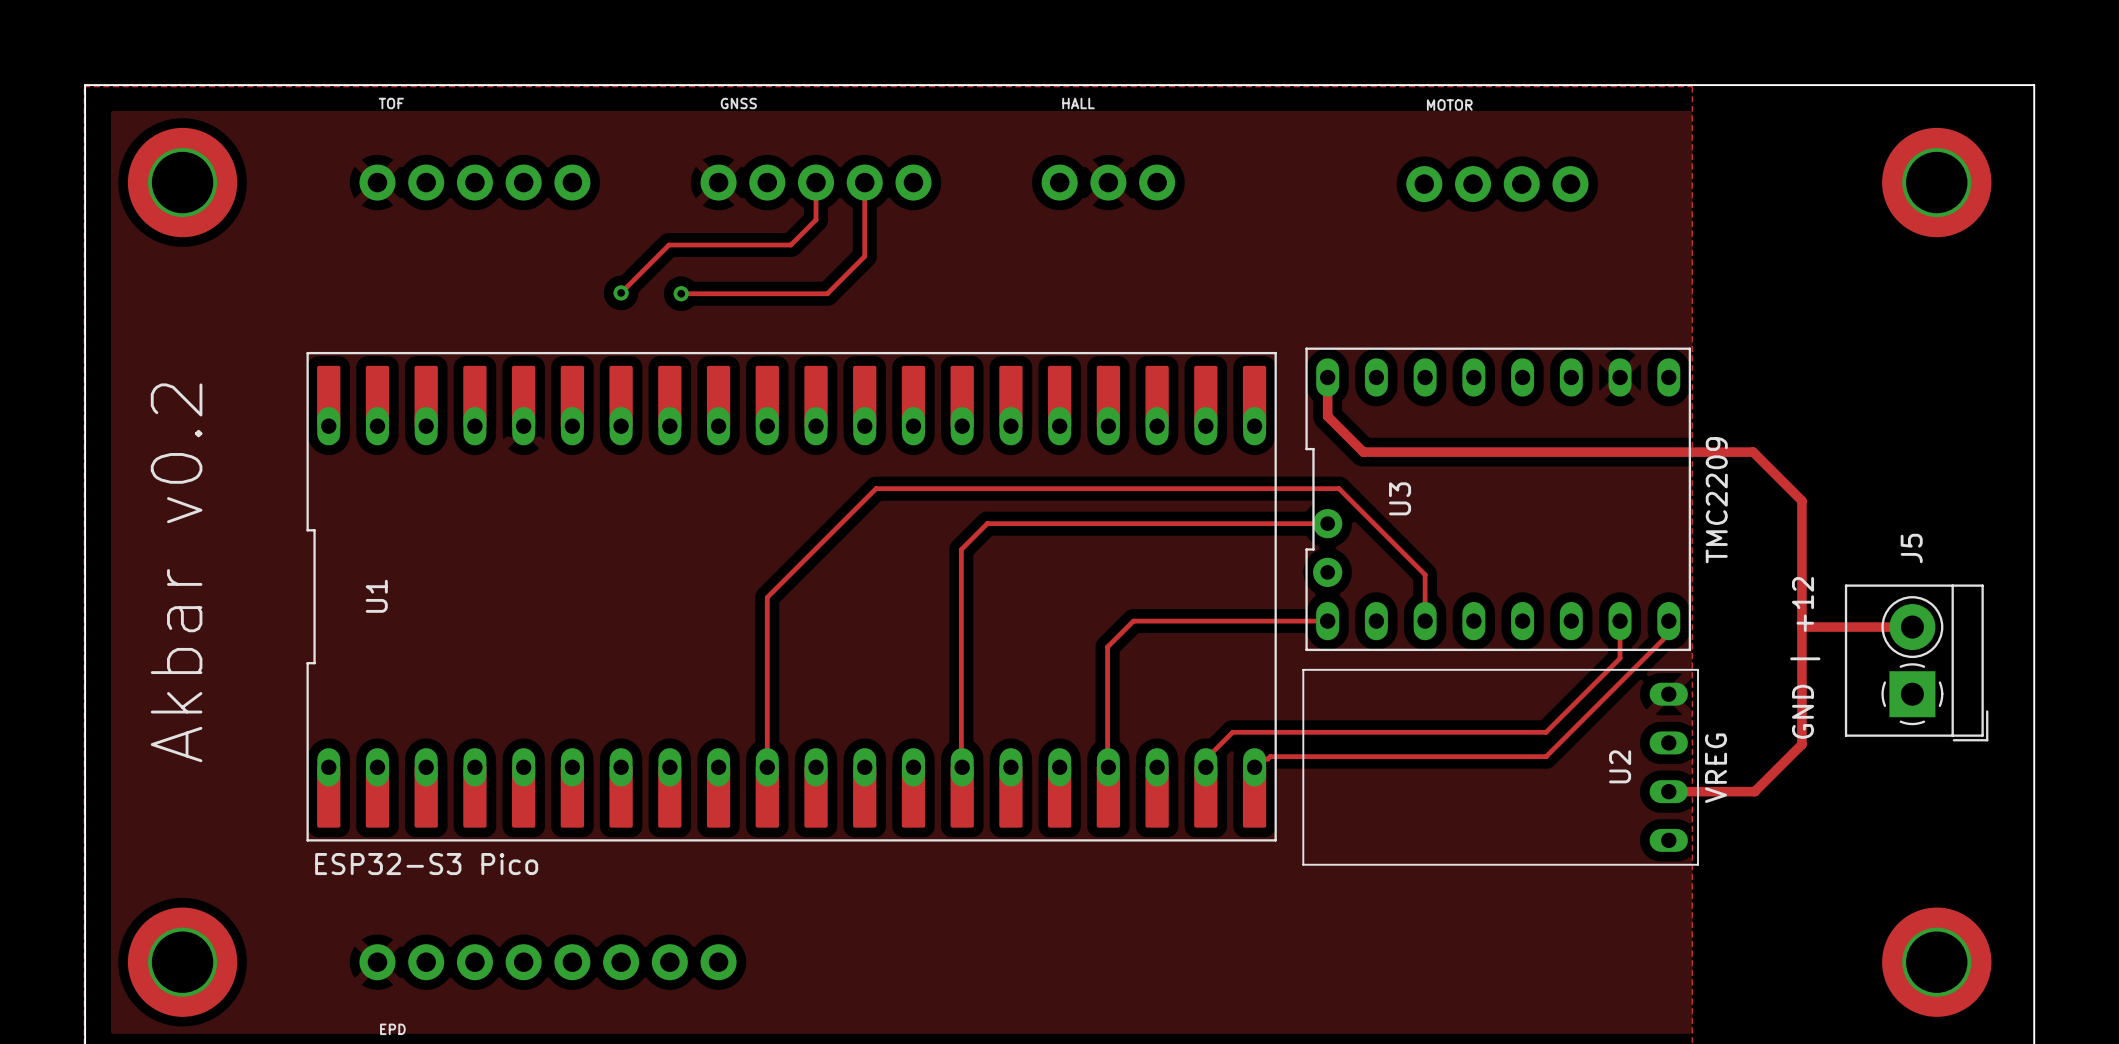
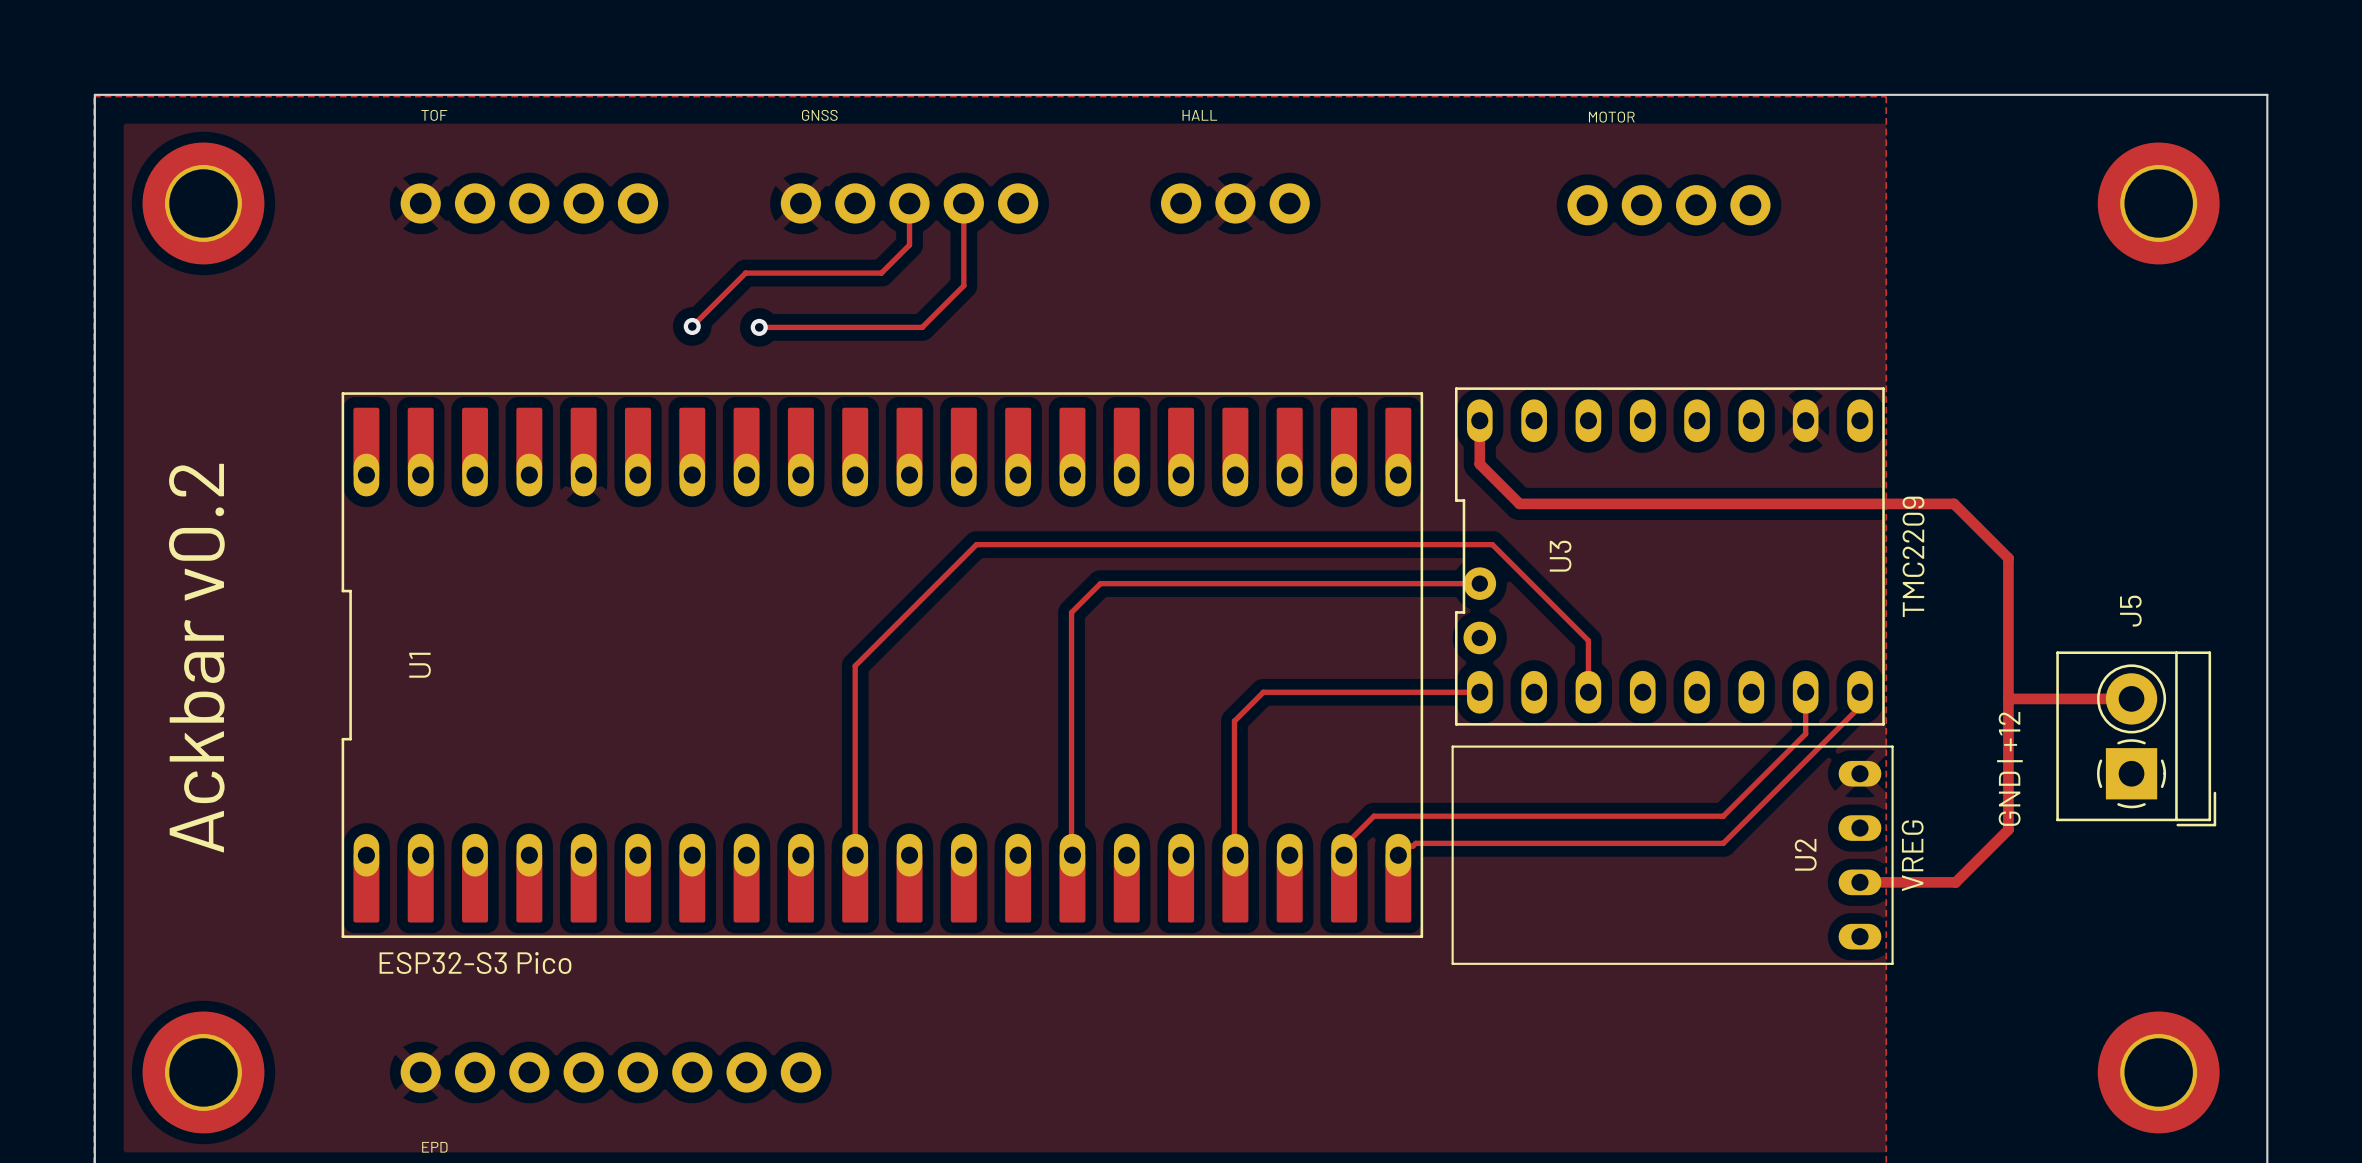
text: Akbar v0.2 (176, 572) -> Ackbar v0.2 (196, 658)

